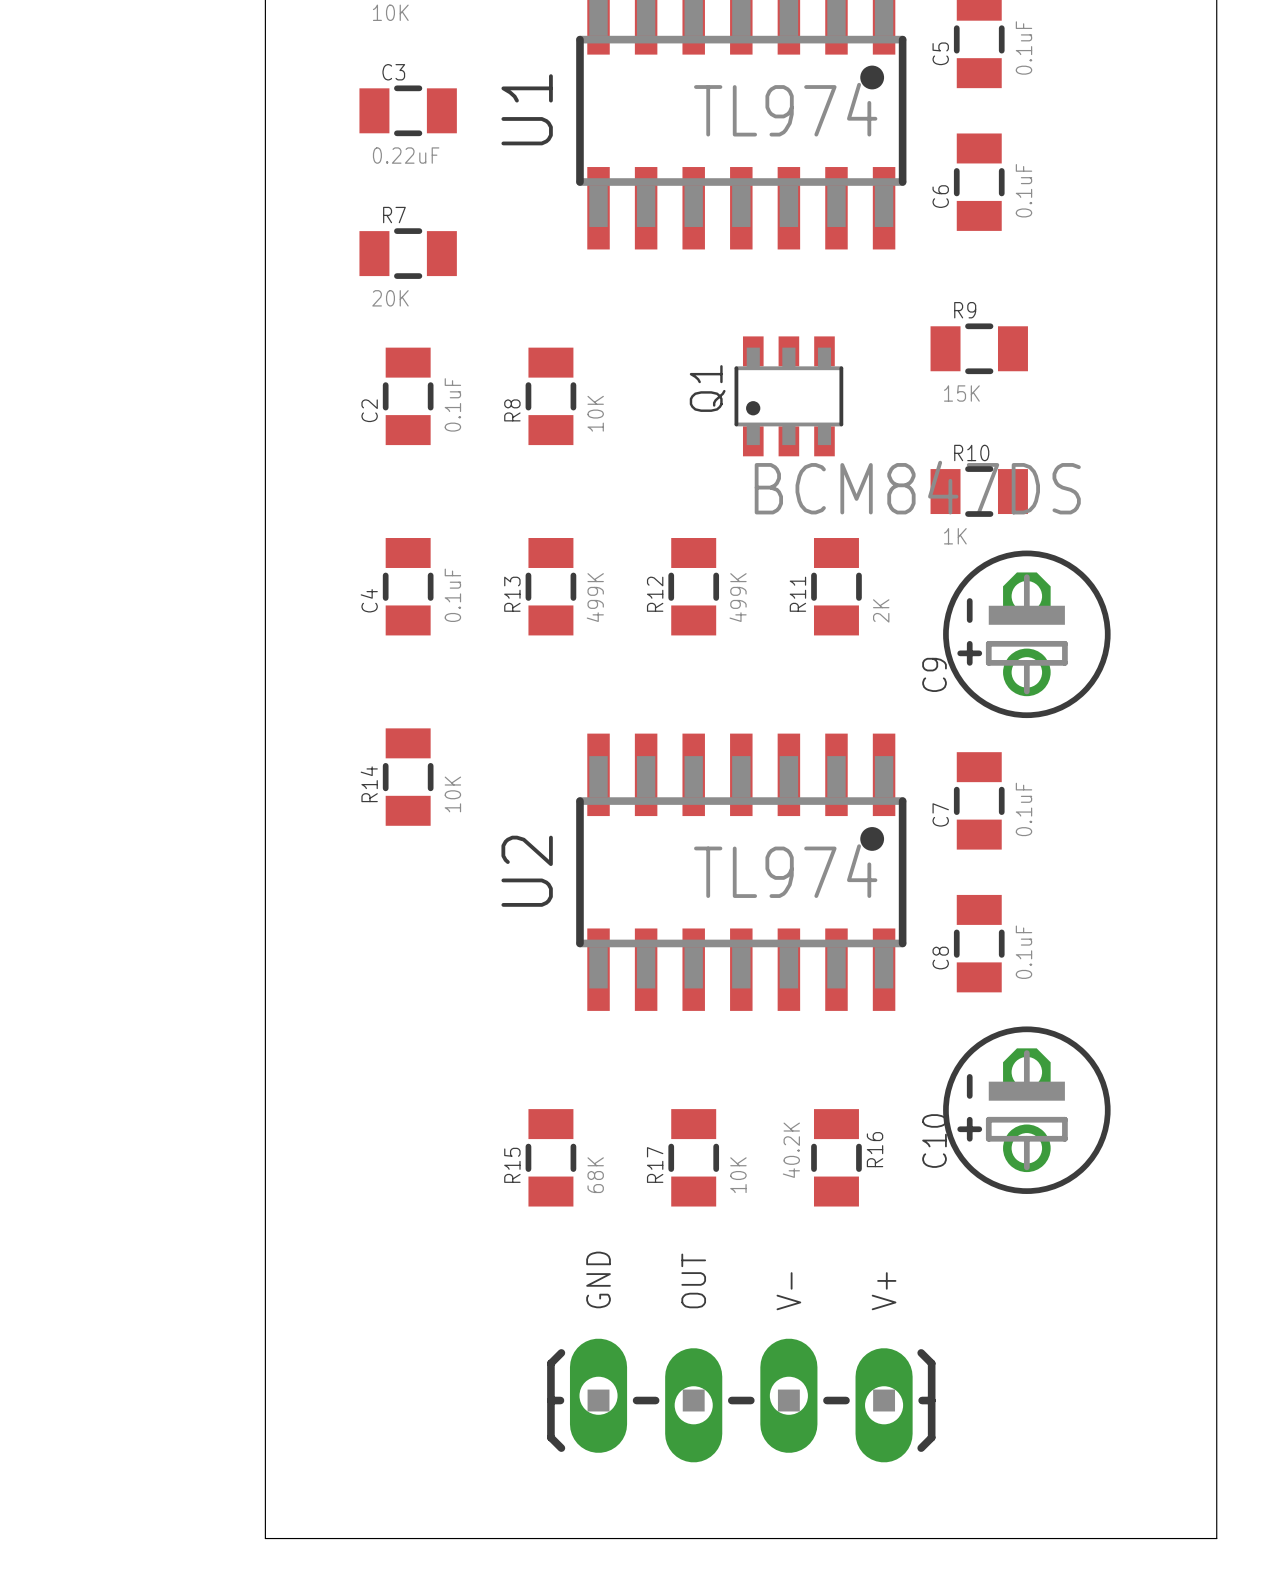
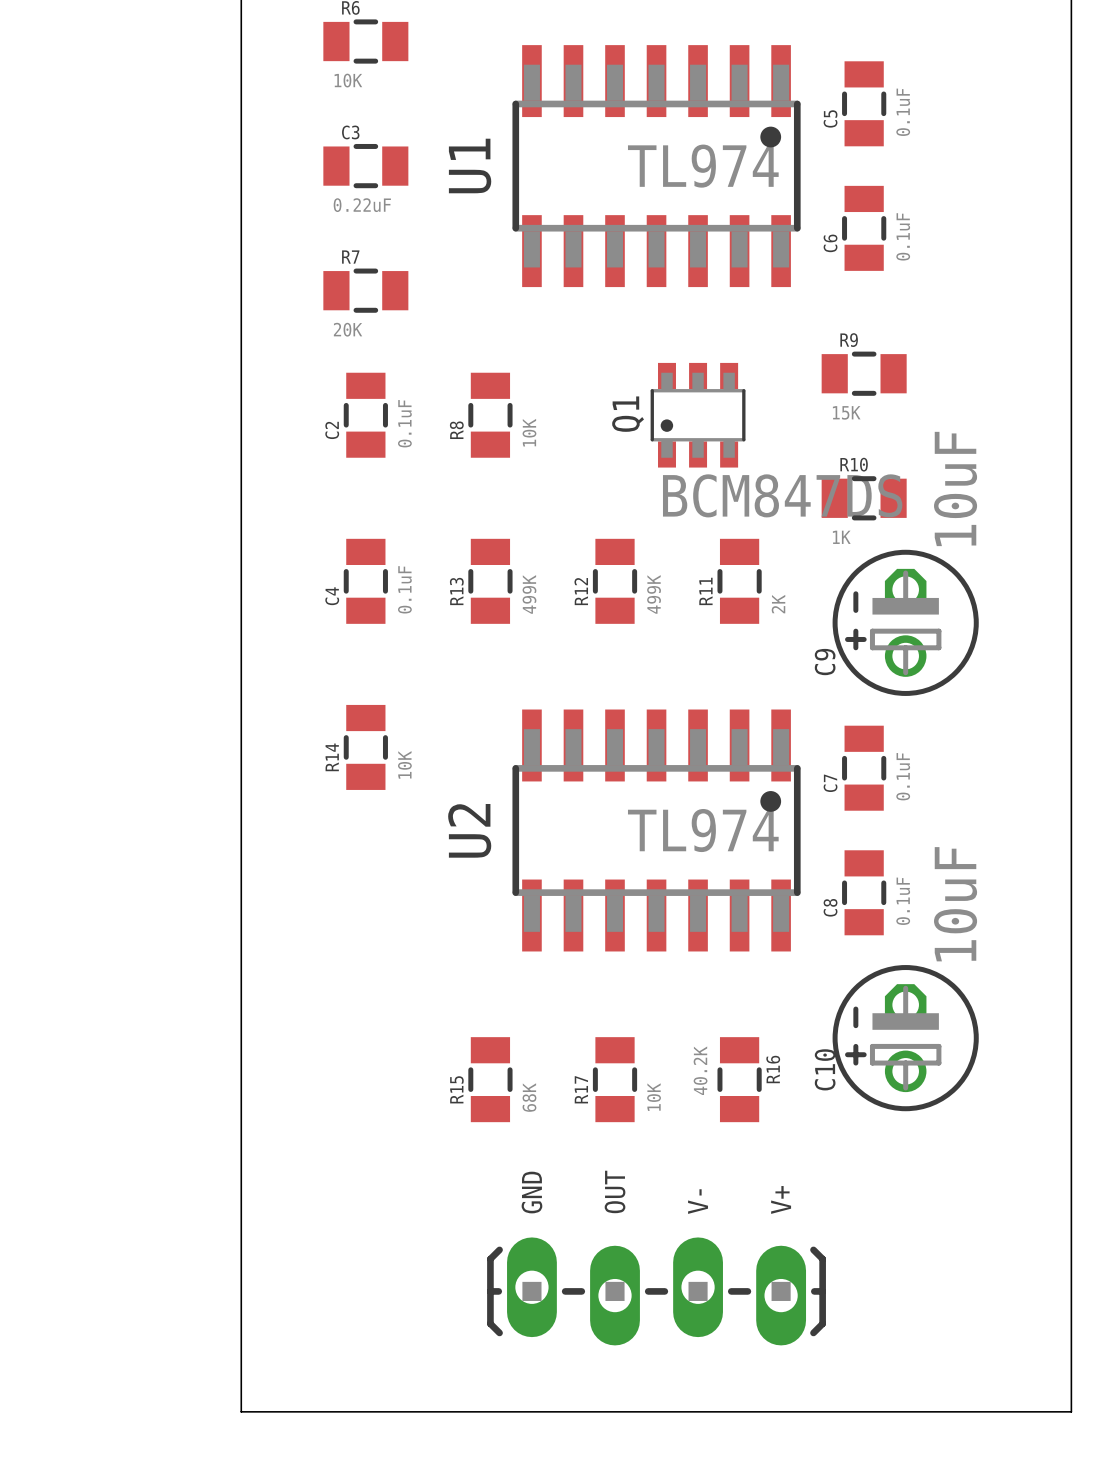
C9 value: none -> 10uF (955, 488)
C10 value: none -> 10uF (955, 904)

